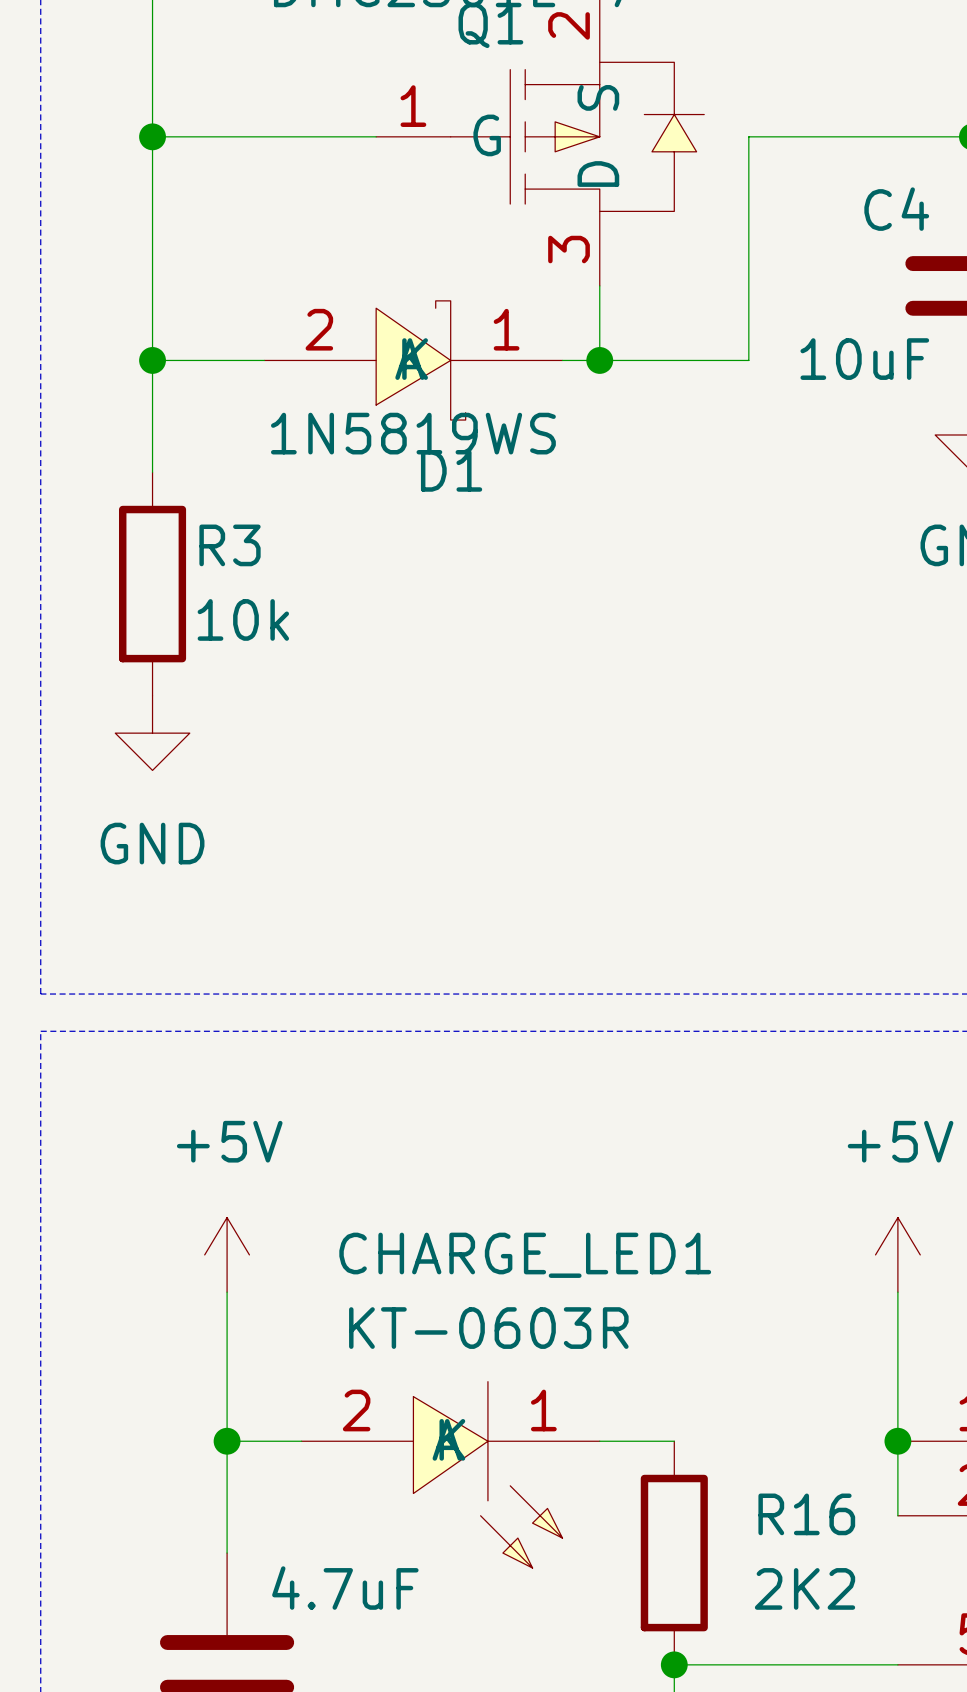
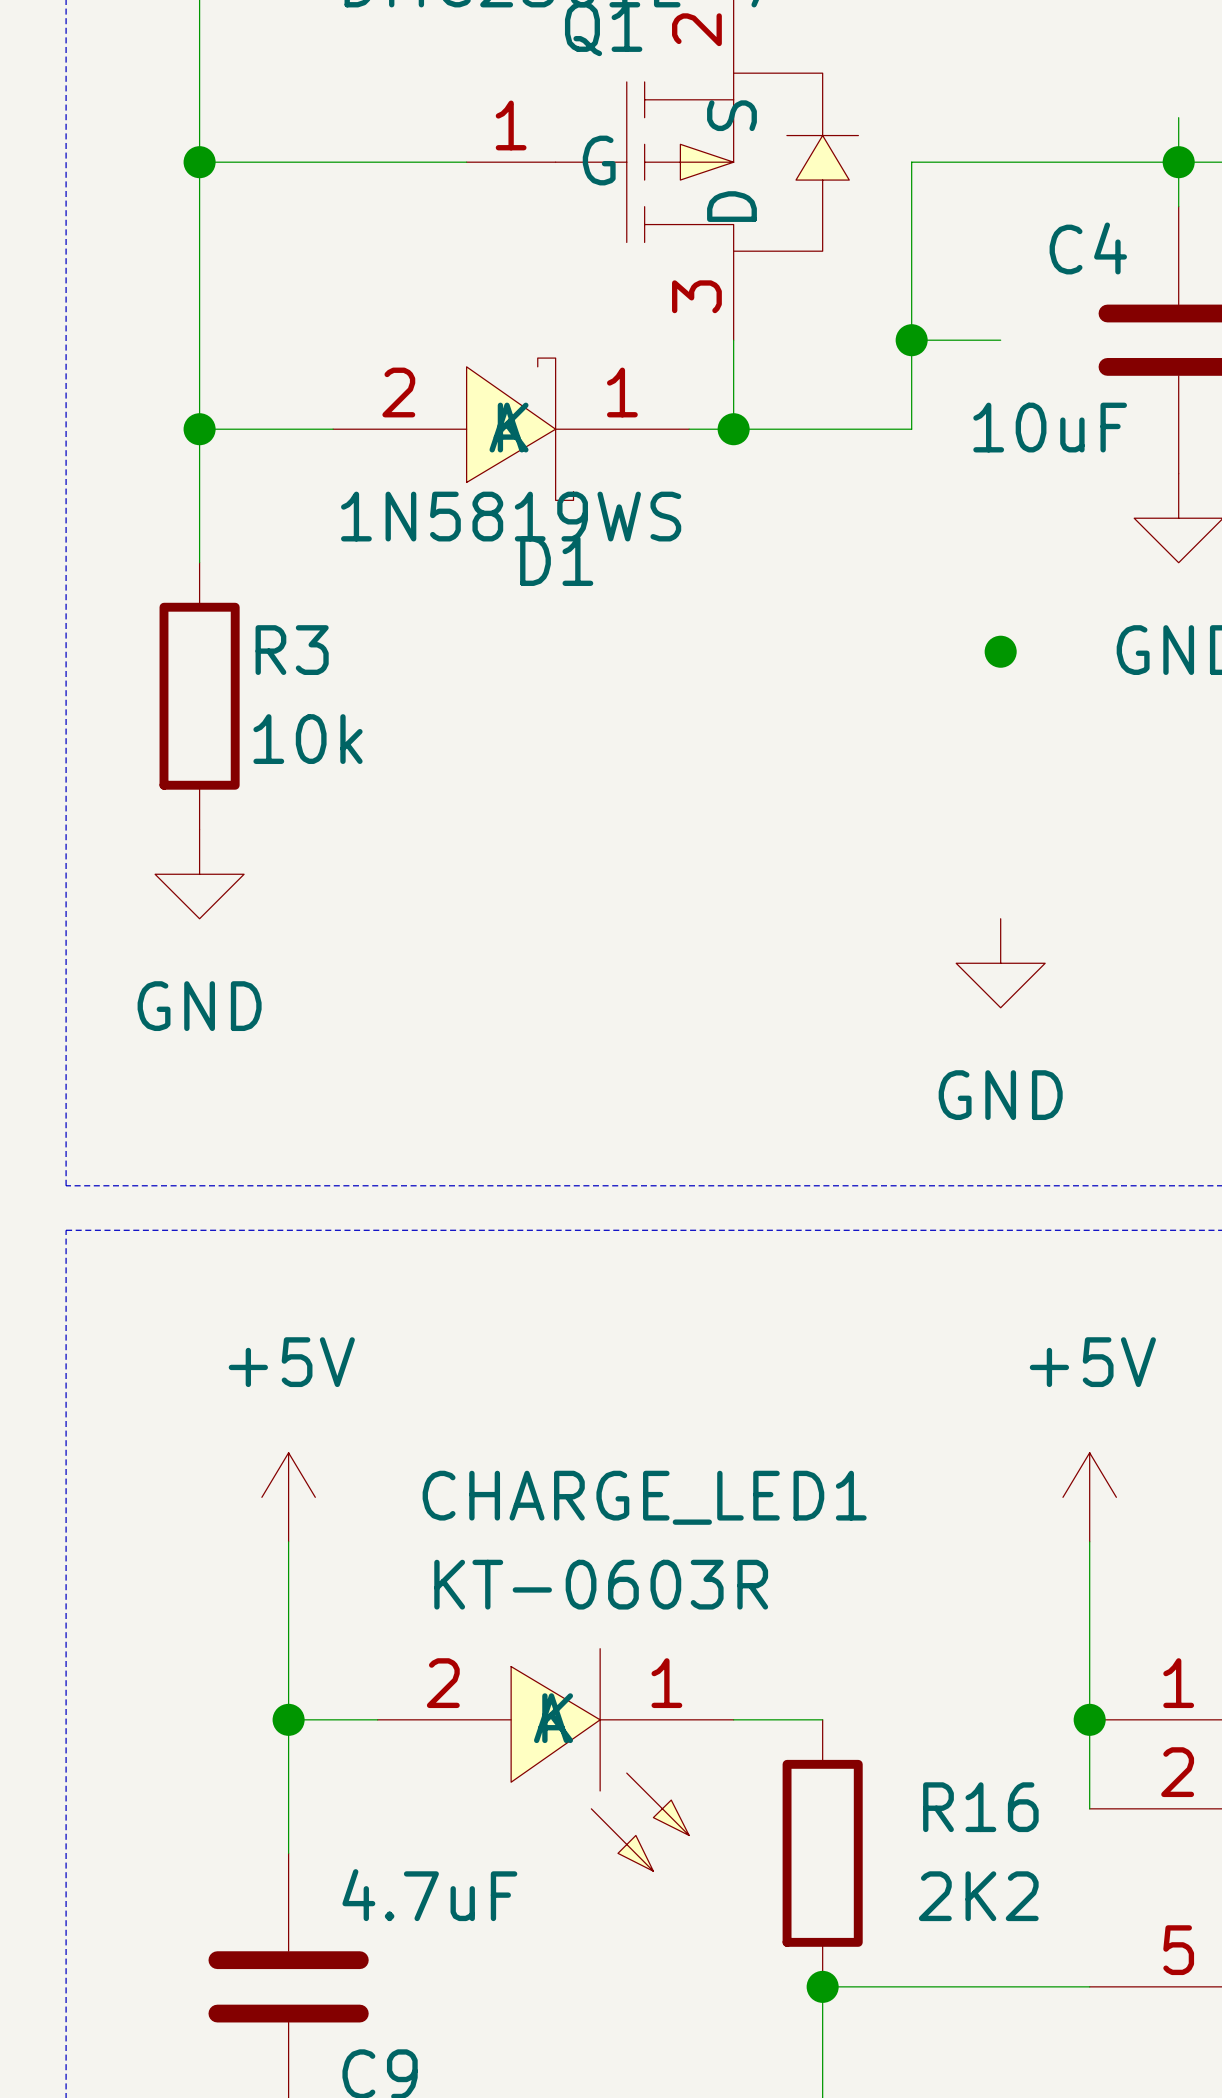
wire: none -> (911, 340) (1000, 340)
junction: none -> (911, 340)
junction: none -> (1000, 651)
power symbol: none -> GND (1000, 963)

